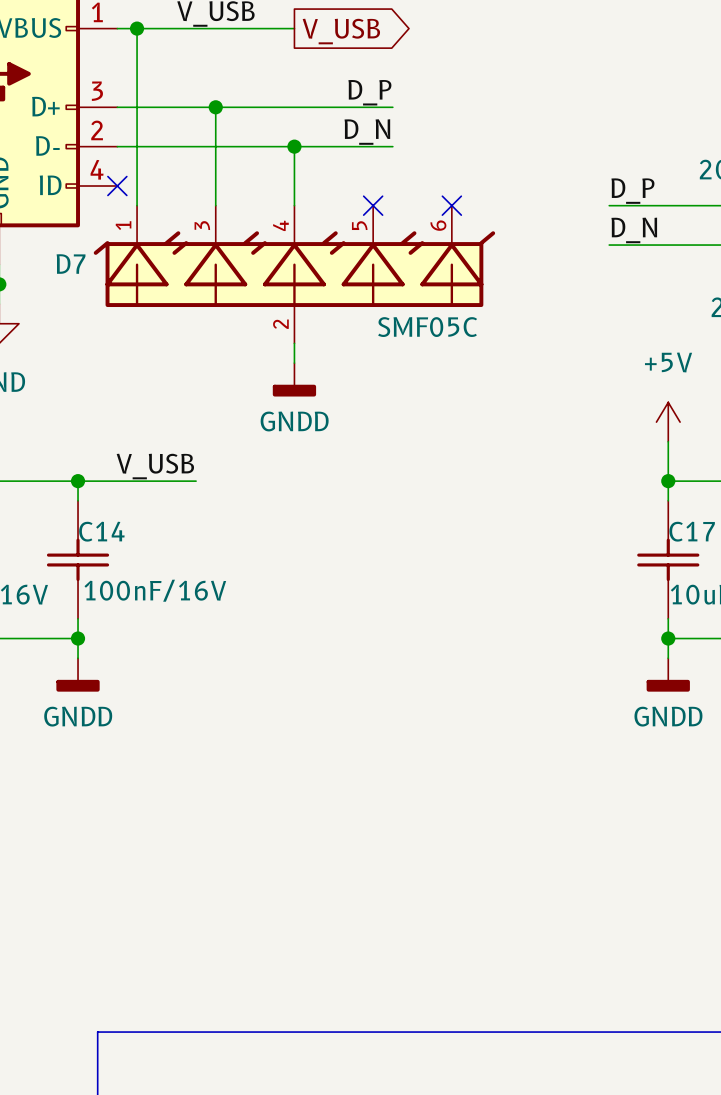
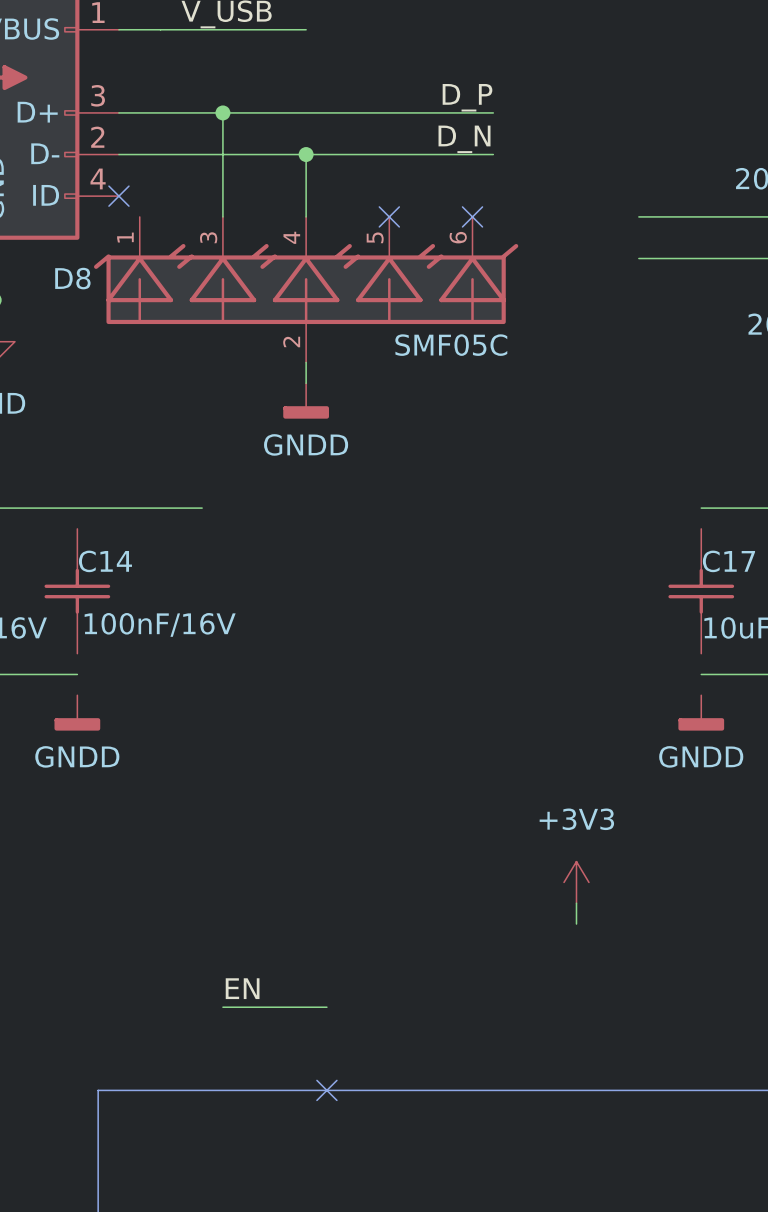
wire: (137, 28) (137, 205) -> none
junction: (137, 28) -> none
global label: V_USB (341, 31) -> none
label position: D_P (369, 92) -> D_P (467, 97)
wire: none -> (410, 112) (493, 112)
label position: D_N (367, 132) -> D_N (464, 139)
wire: none -> (410, 154) (493, 154)
label: D_P (632, 191) -> none
label: D_N (634, 230) -> none
D7 name: D7 (71, 264) -> D8 (72, 278)
power symbol: +5V (668, 422) -> none
wire: (668, 441) (668, 500) -> none
label: V_USB (155, 466) -> none
wire: (78, 481) (78, 500) -> none
junction: (78, 481) -> none
junction: (668, 481) -> none
wire: (78, 618) (78, 658) -> none
wire: (668, 618) (668, 658) -> none
junction: (78, 638) -> none
junction: (668, 638) -> none
power symbol: none -> +3V3 (576, 882)
wire: none -> (576, 903) (576, 924)
label: none -> EN (242, 988)
wire: none -> (222, 1007) (326, 1007)
no-connect mark: none -> (326, 1090)

